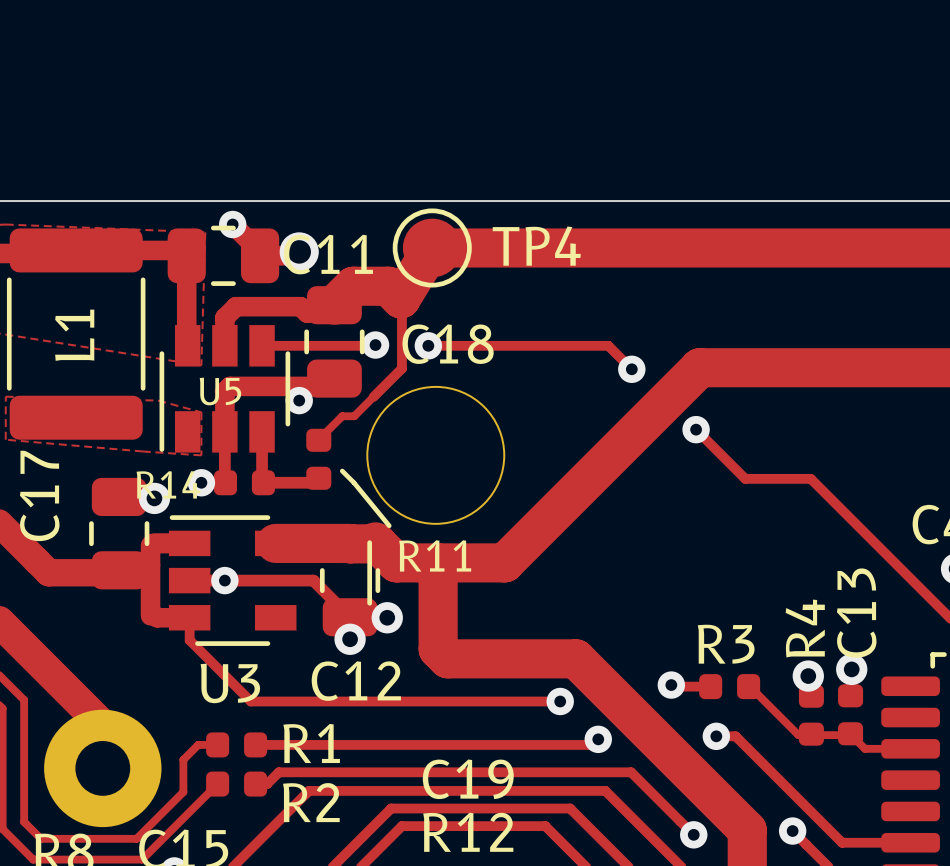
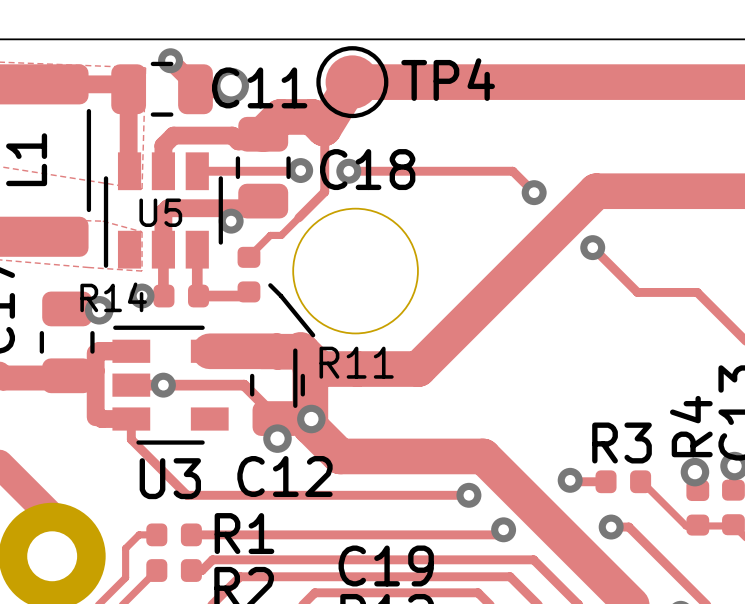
track: (438, 562) (438, 649) (447, 658) -> (319, 369) (310, 369) (310, 426) (340, 456) (366, 456)

